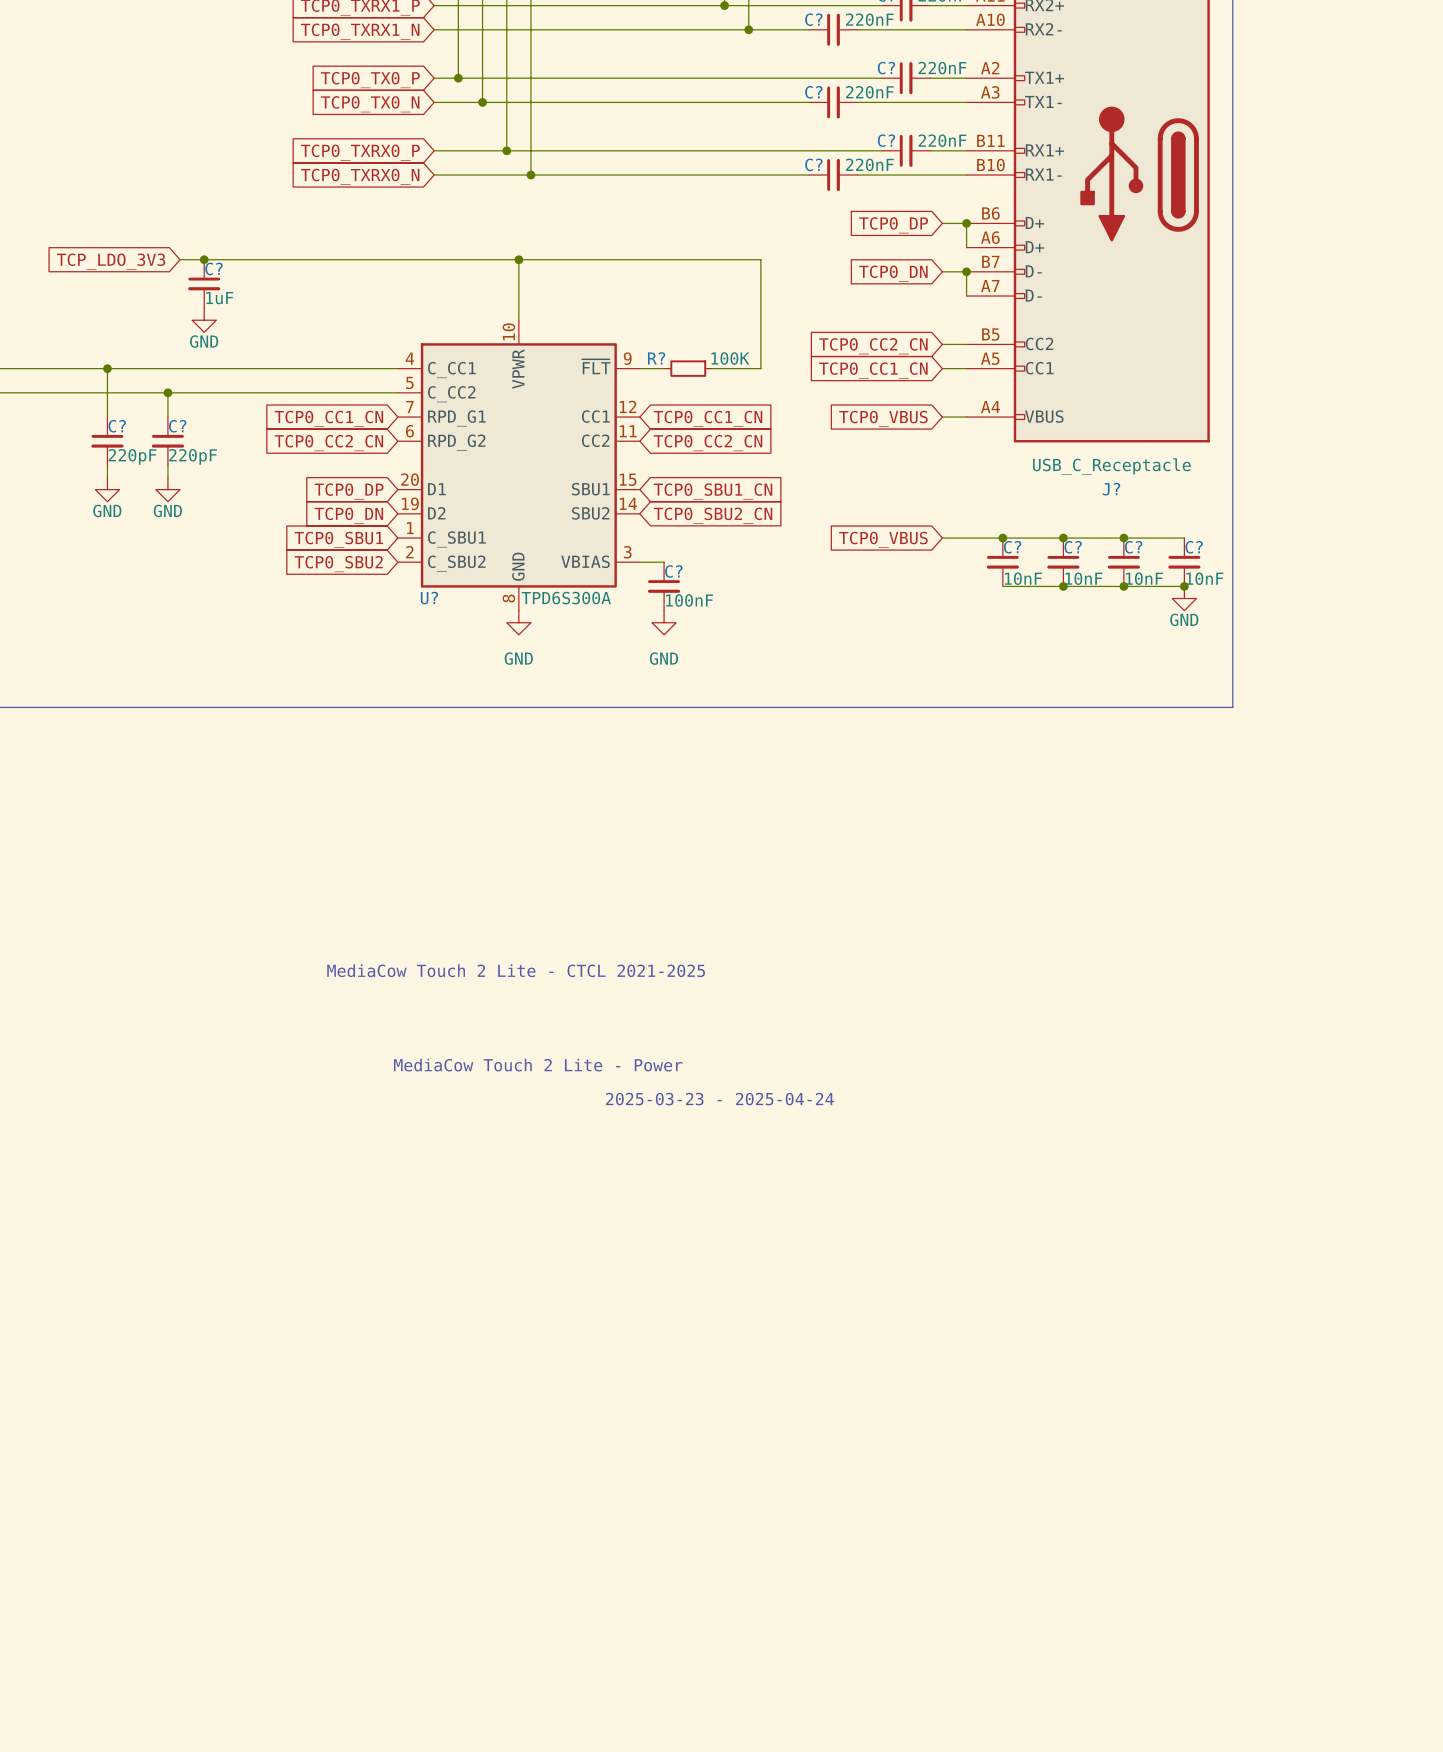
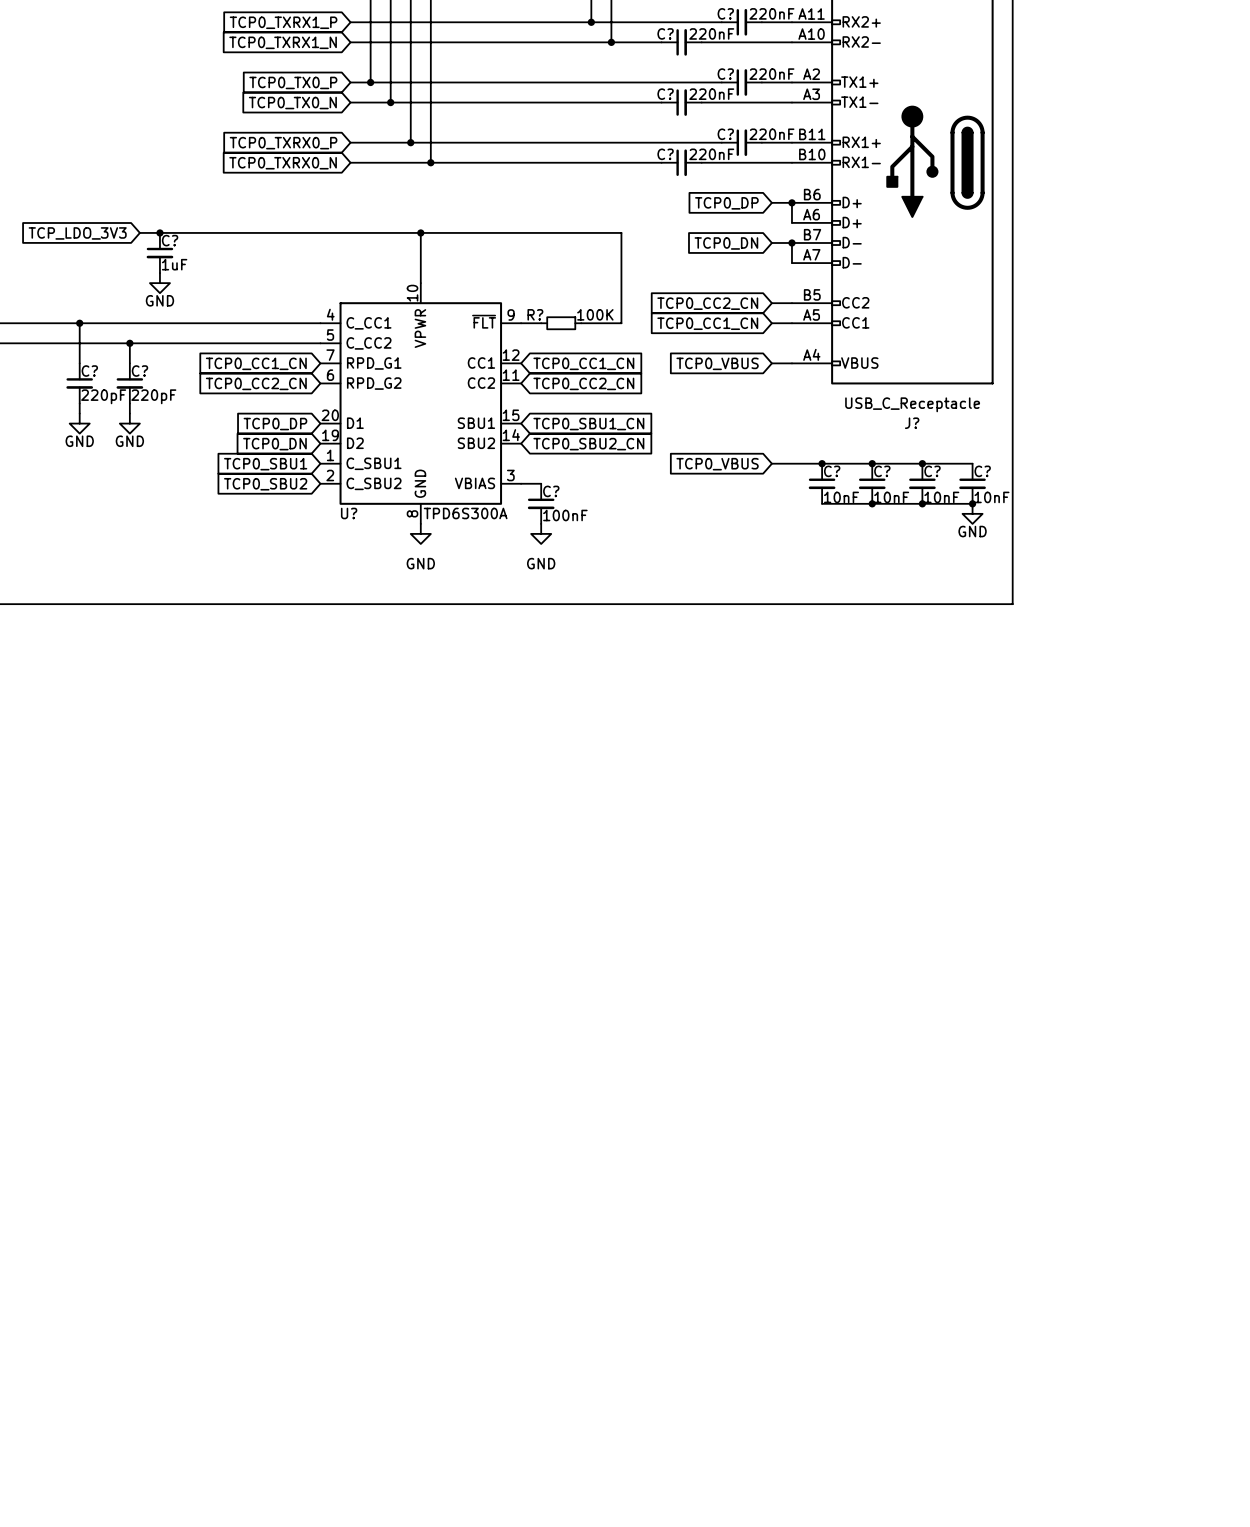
text: MediaCow Touch 2 Lite - CTCL 2021-2025 (516, 970) -> none
text: MediaCow Touch 2 Lite - Power (538, 1065) -> none
text: 2025-03-23 - 2025-04-24 (719, 1099) -> none

